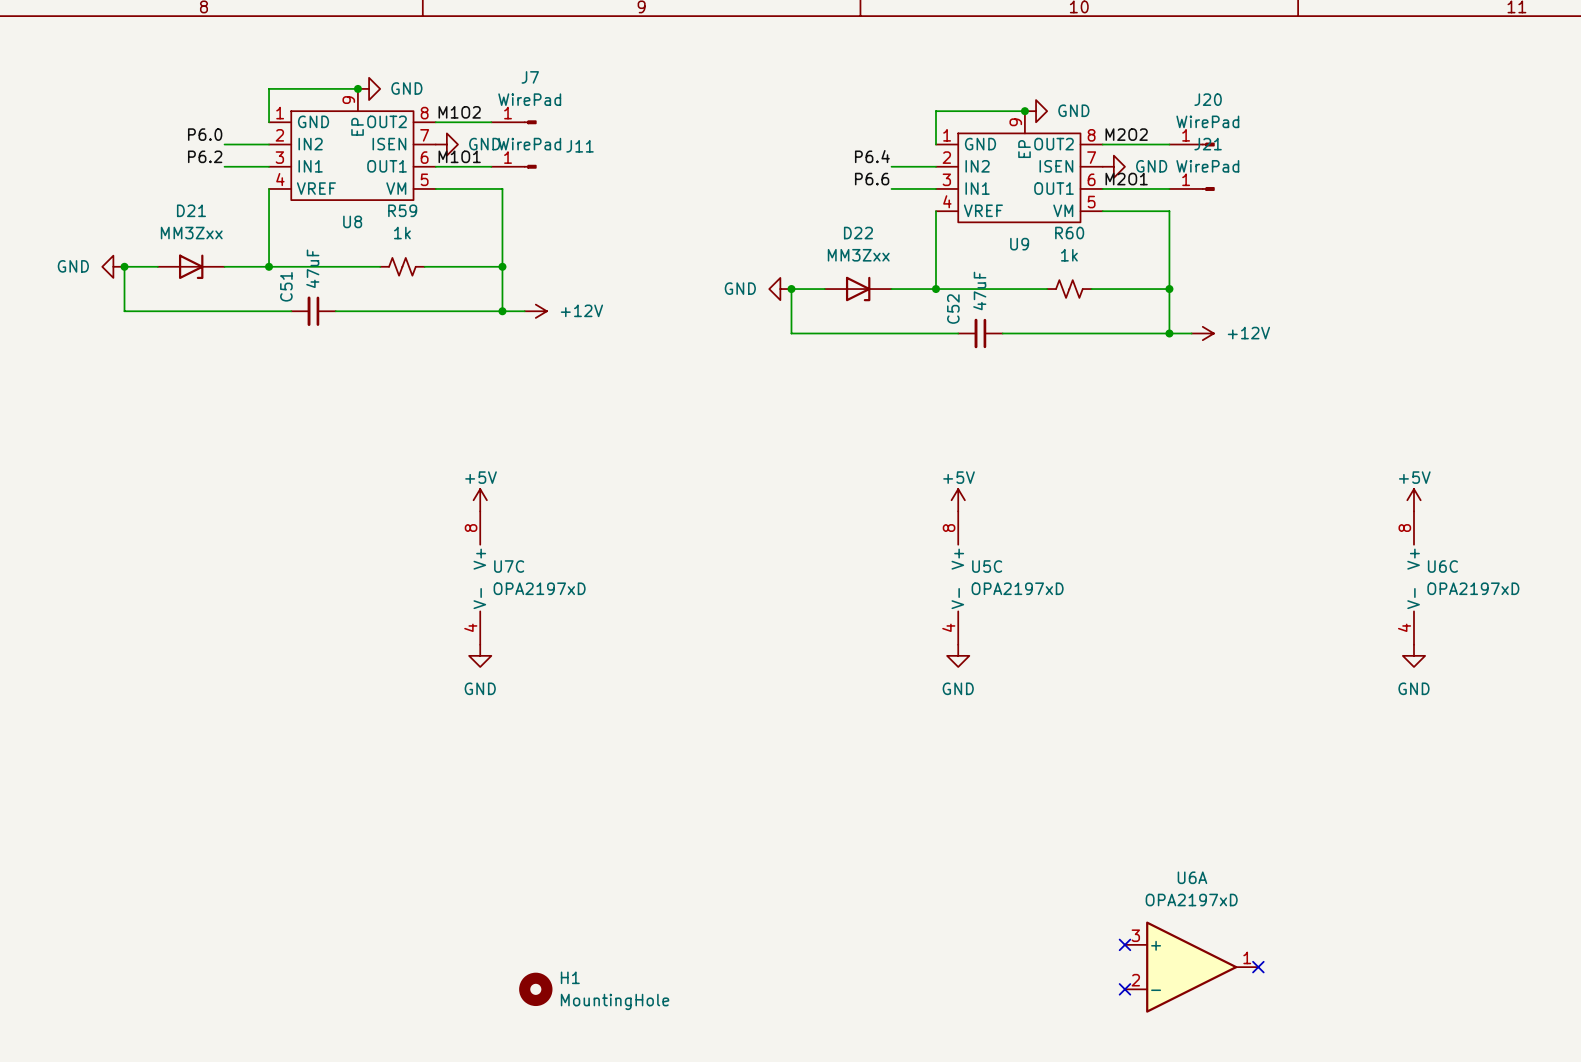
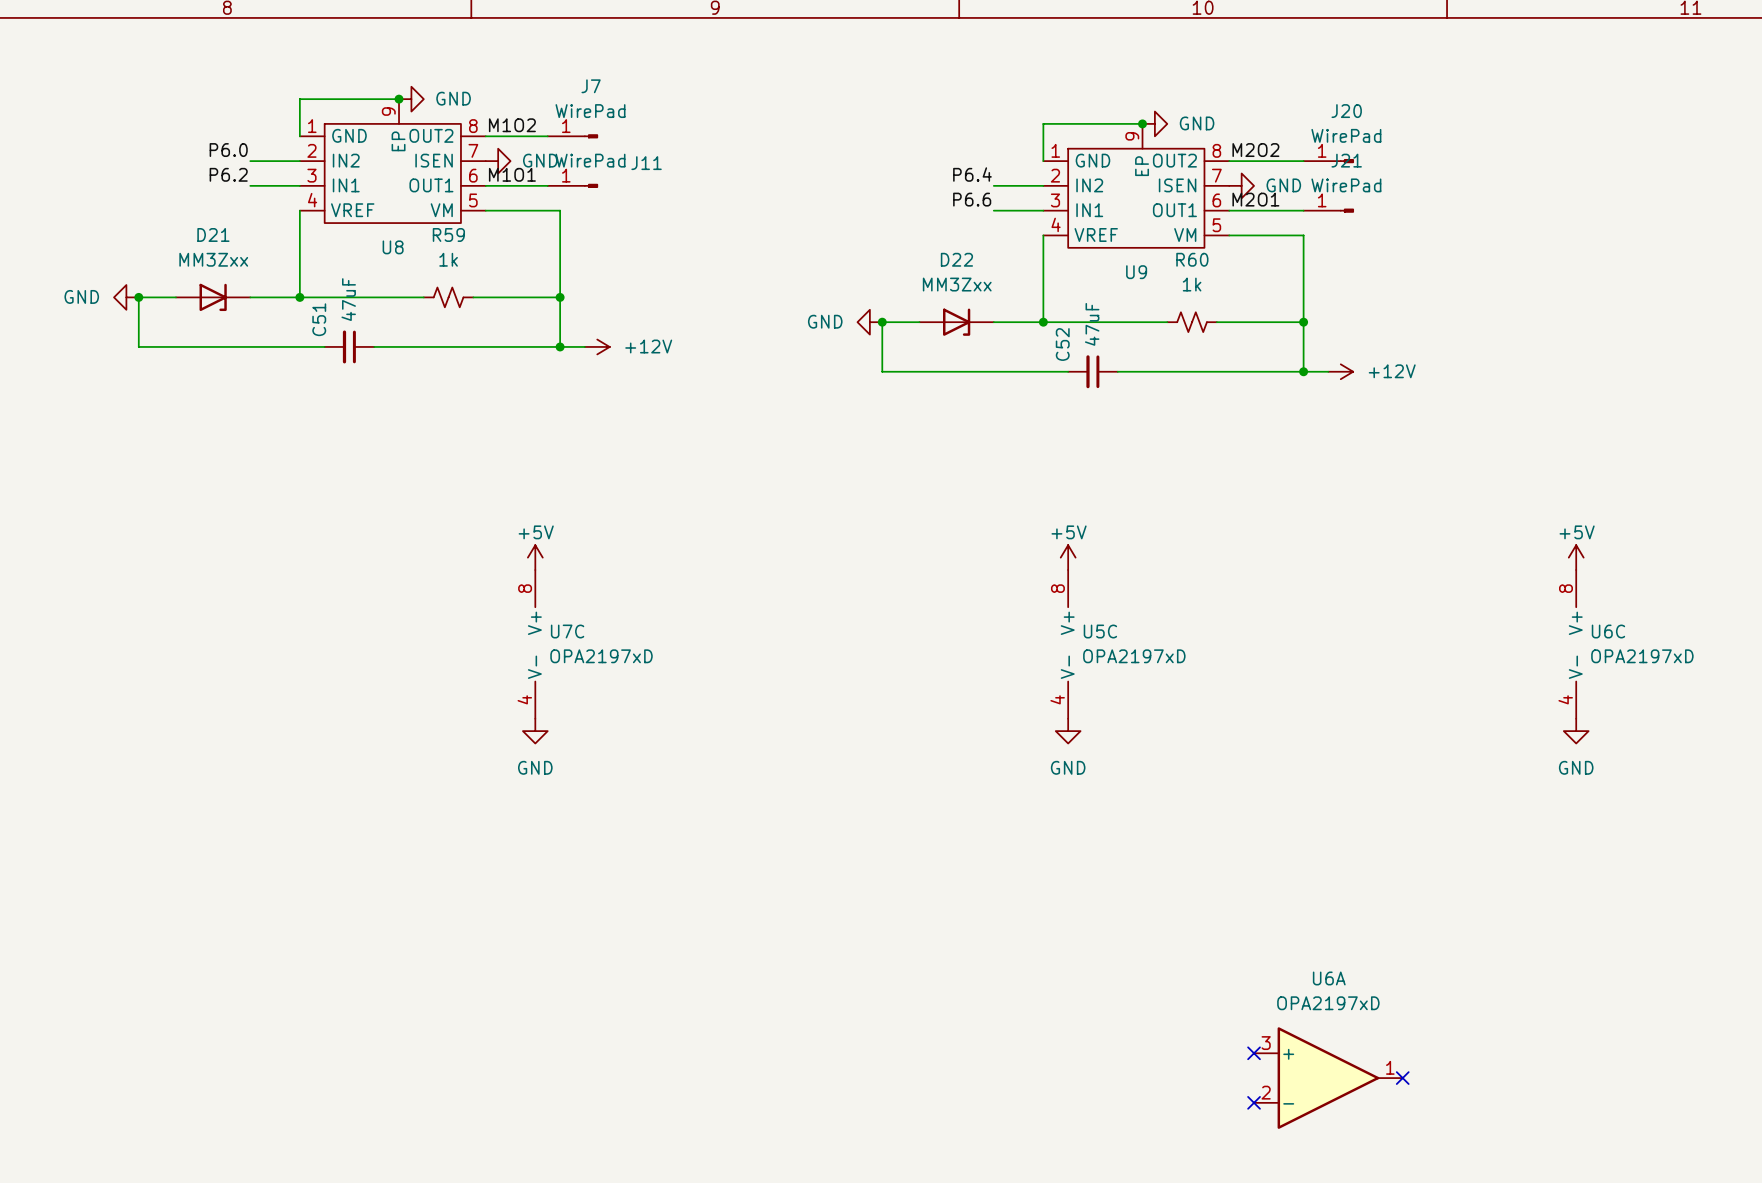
H1: MountingHole (535, 989) -> none

